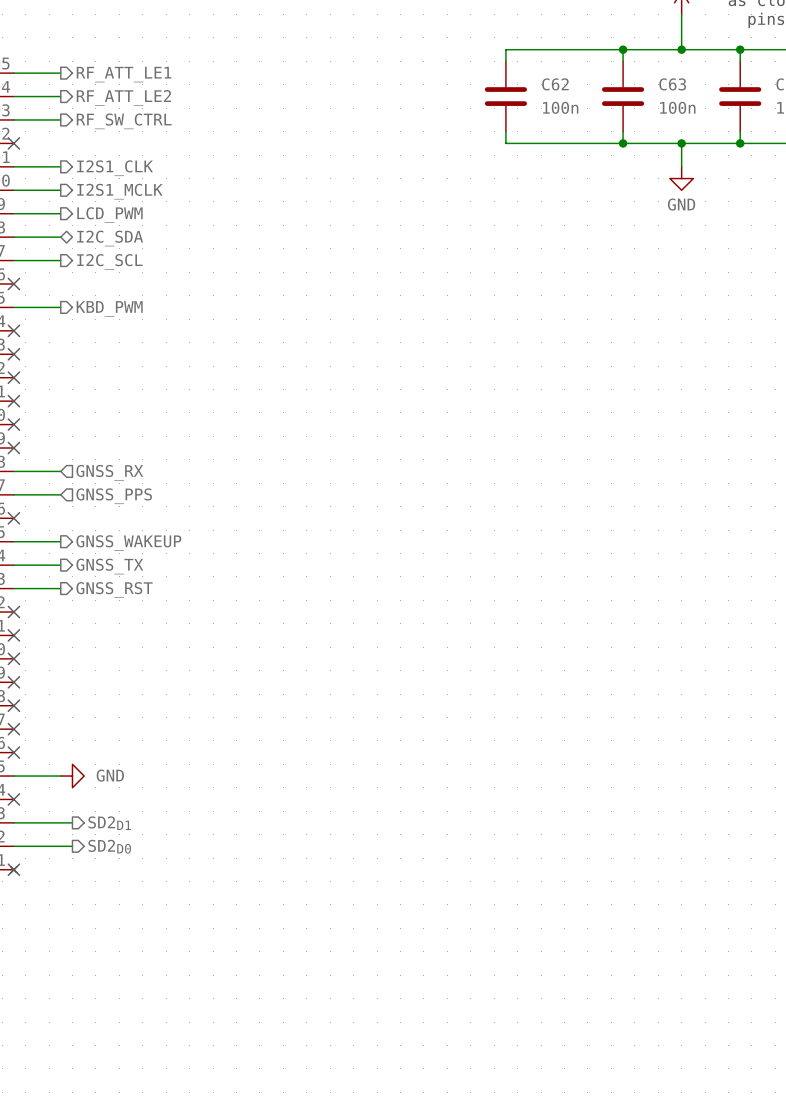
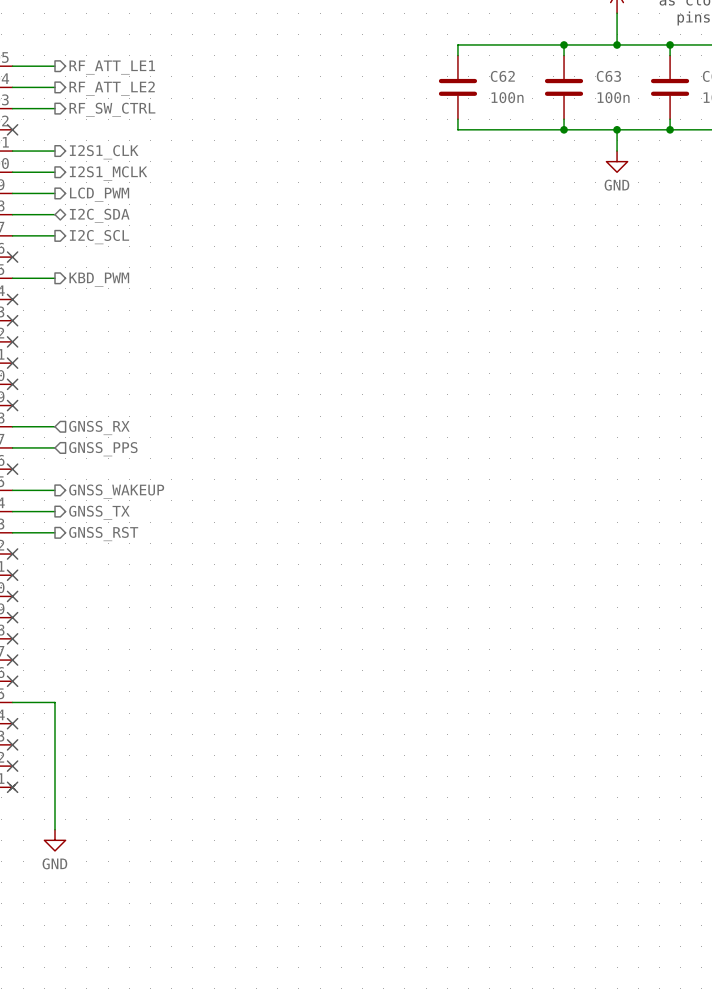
power symbol text position: GND (110, 775) -> GND (54, 863)
wire: none -> (55, 702) (55, 829)
power symbol rotation: 0° (72, 776) -> 90° clockwise (55, 840)
power symbol position: GND (72, 776) -> GND (55, 840)
wire: (13, 822) (72, 822) -> none
no-connect mark: none -> (12, 744)
hierarchical label: SD2D1 (109, 823) -> none
wire: (13, 846) (72, 846) -> none
no-connect mark: none -> (12, 766)
hierarchical label: SD2D0 (109, 846) -> none

